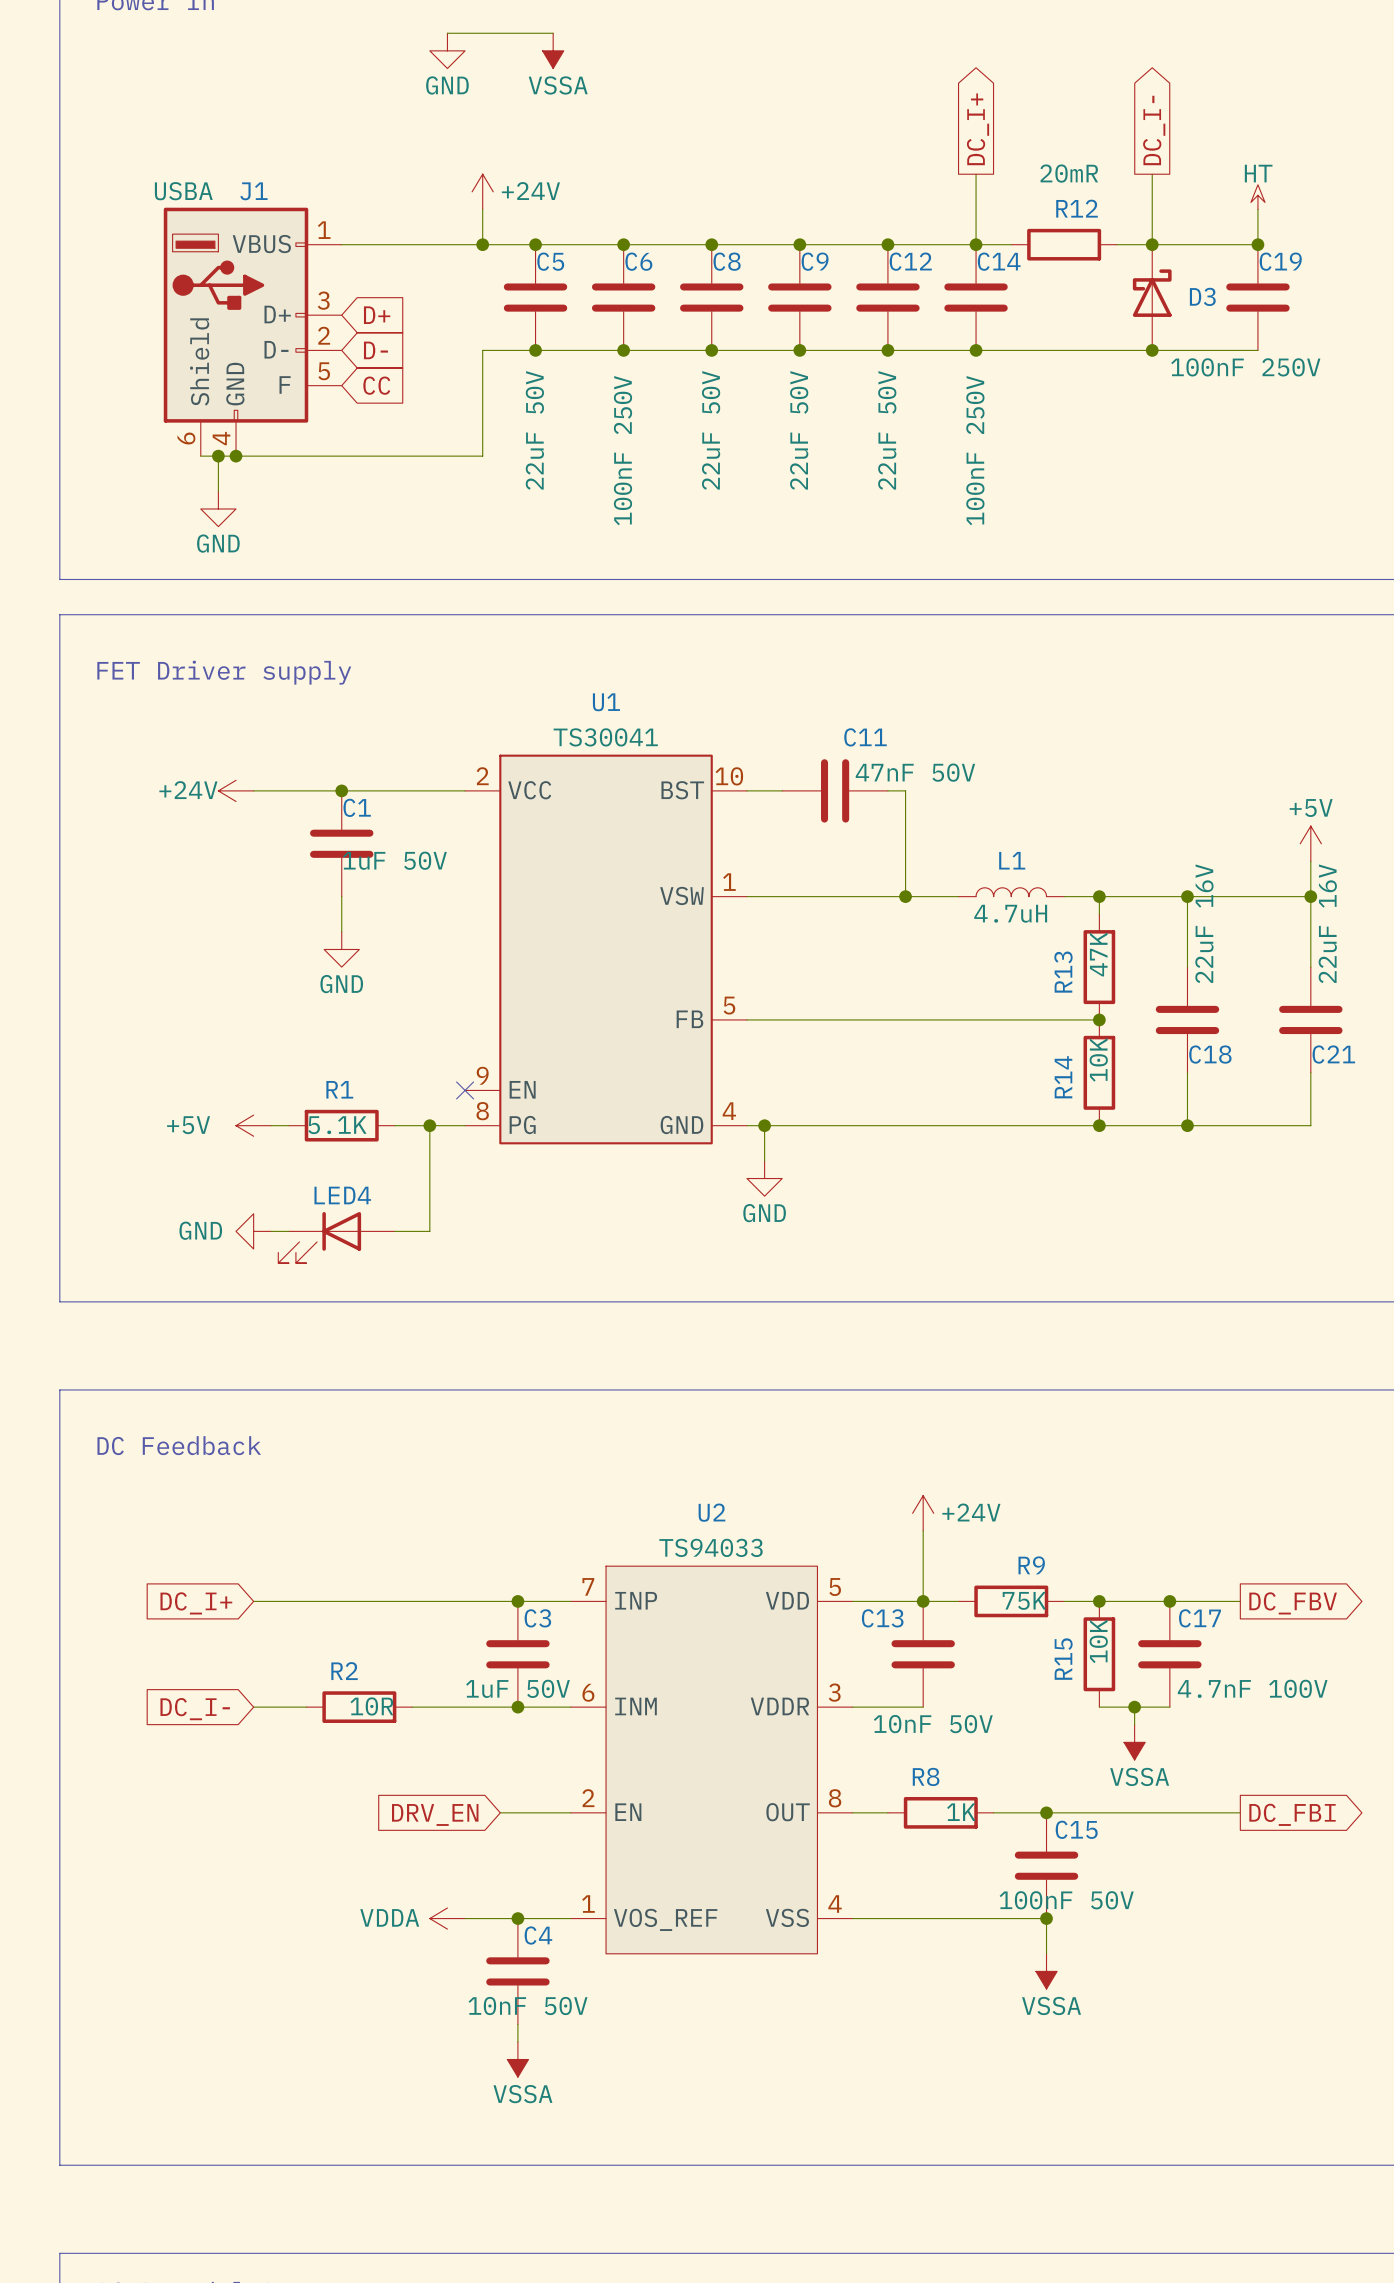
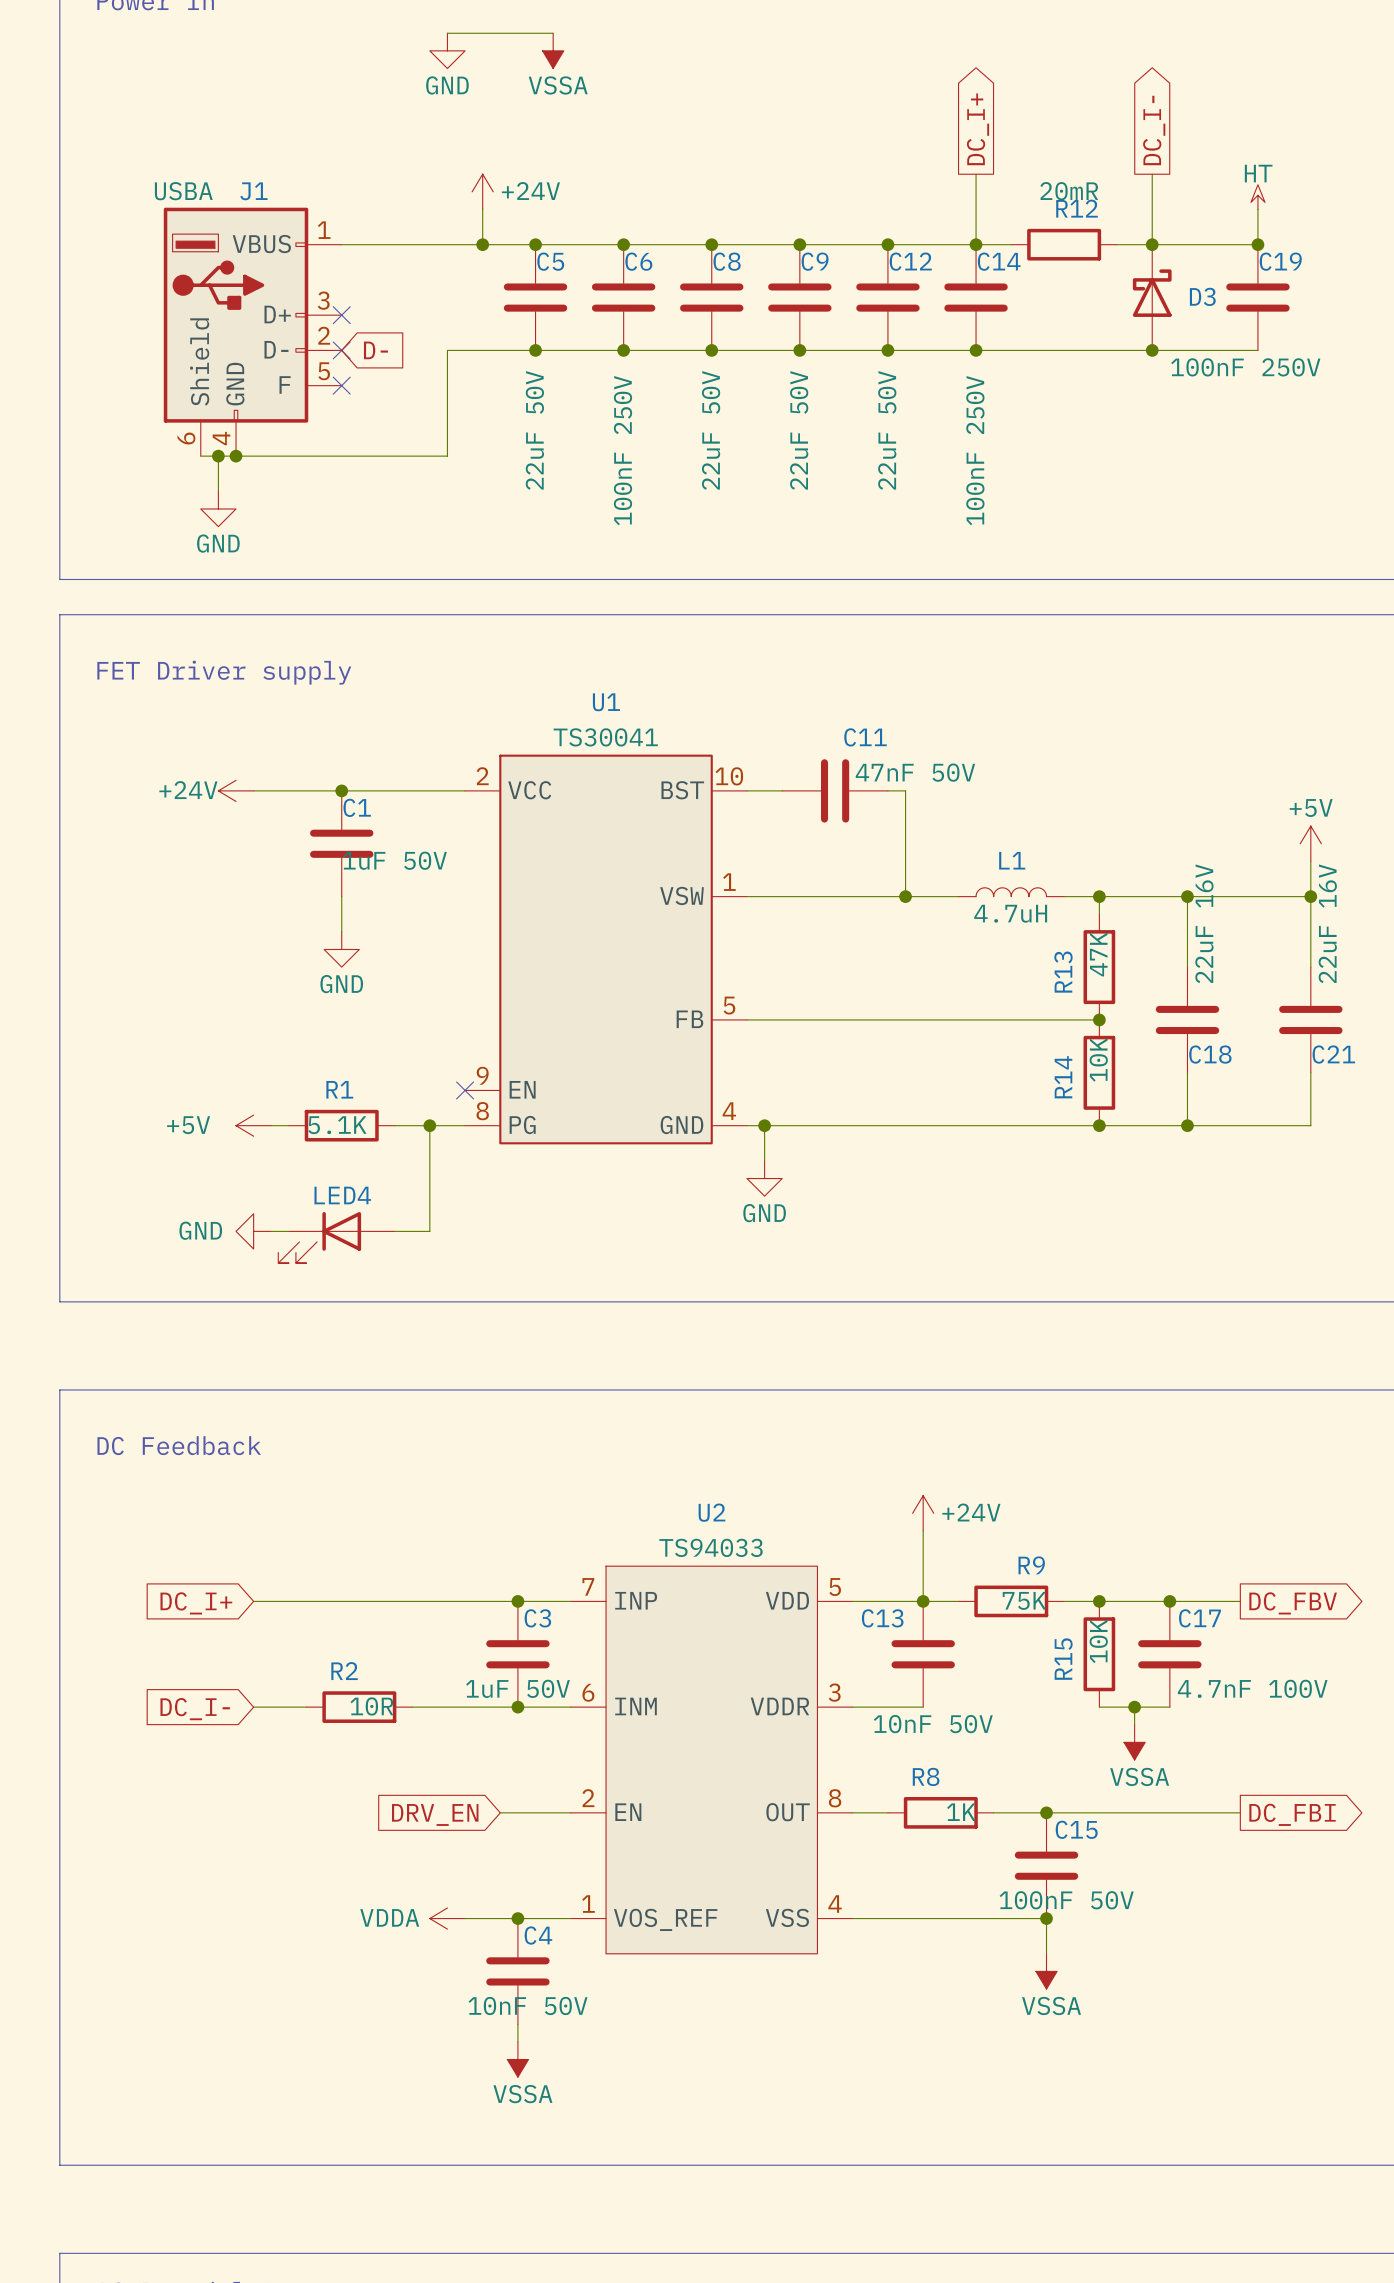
R12 value position: 20mR (1069, 173) -> 20mR (1069, 191)
no-connect mark: none -> (341, 315)
global label: D+ (377, 315) -> none
no-connect mark: none -> (341, 350)
wire: (482, 350) (482, 456) (447, 456) -> (482, 350) (447, 350) (447, 456)
no-connect mark: none -> (341, 385)
global label: CC (376, 385) -> none

